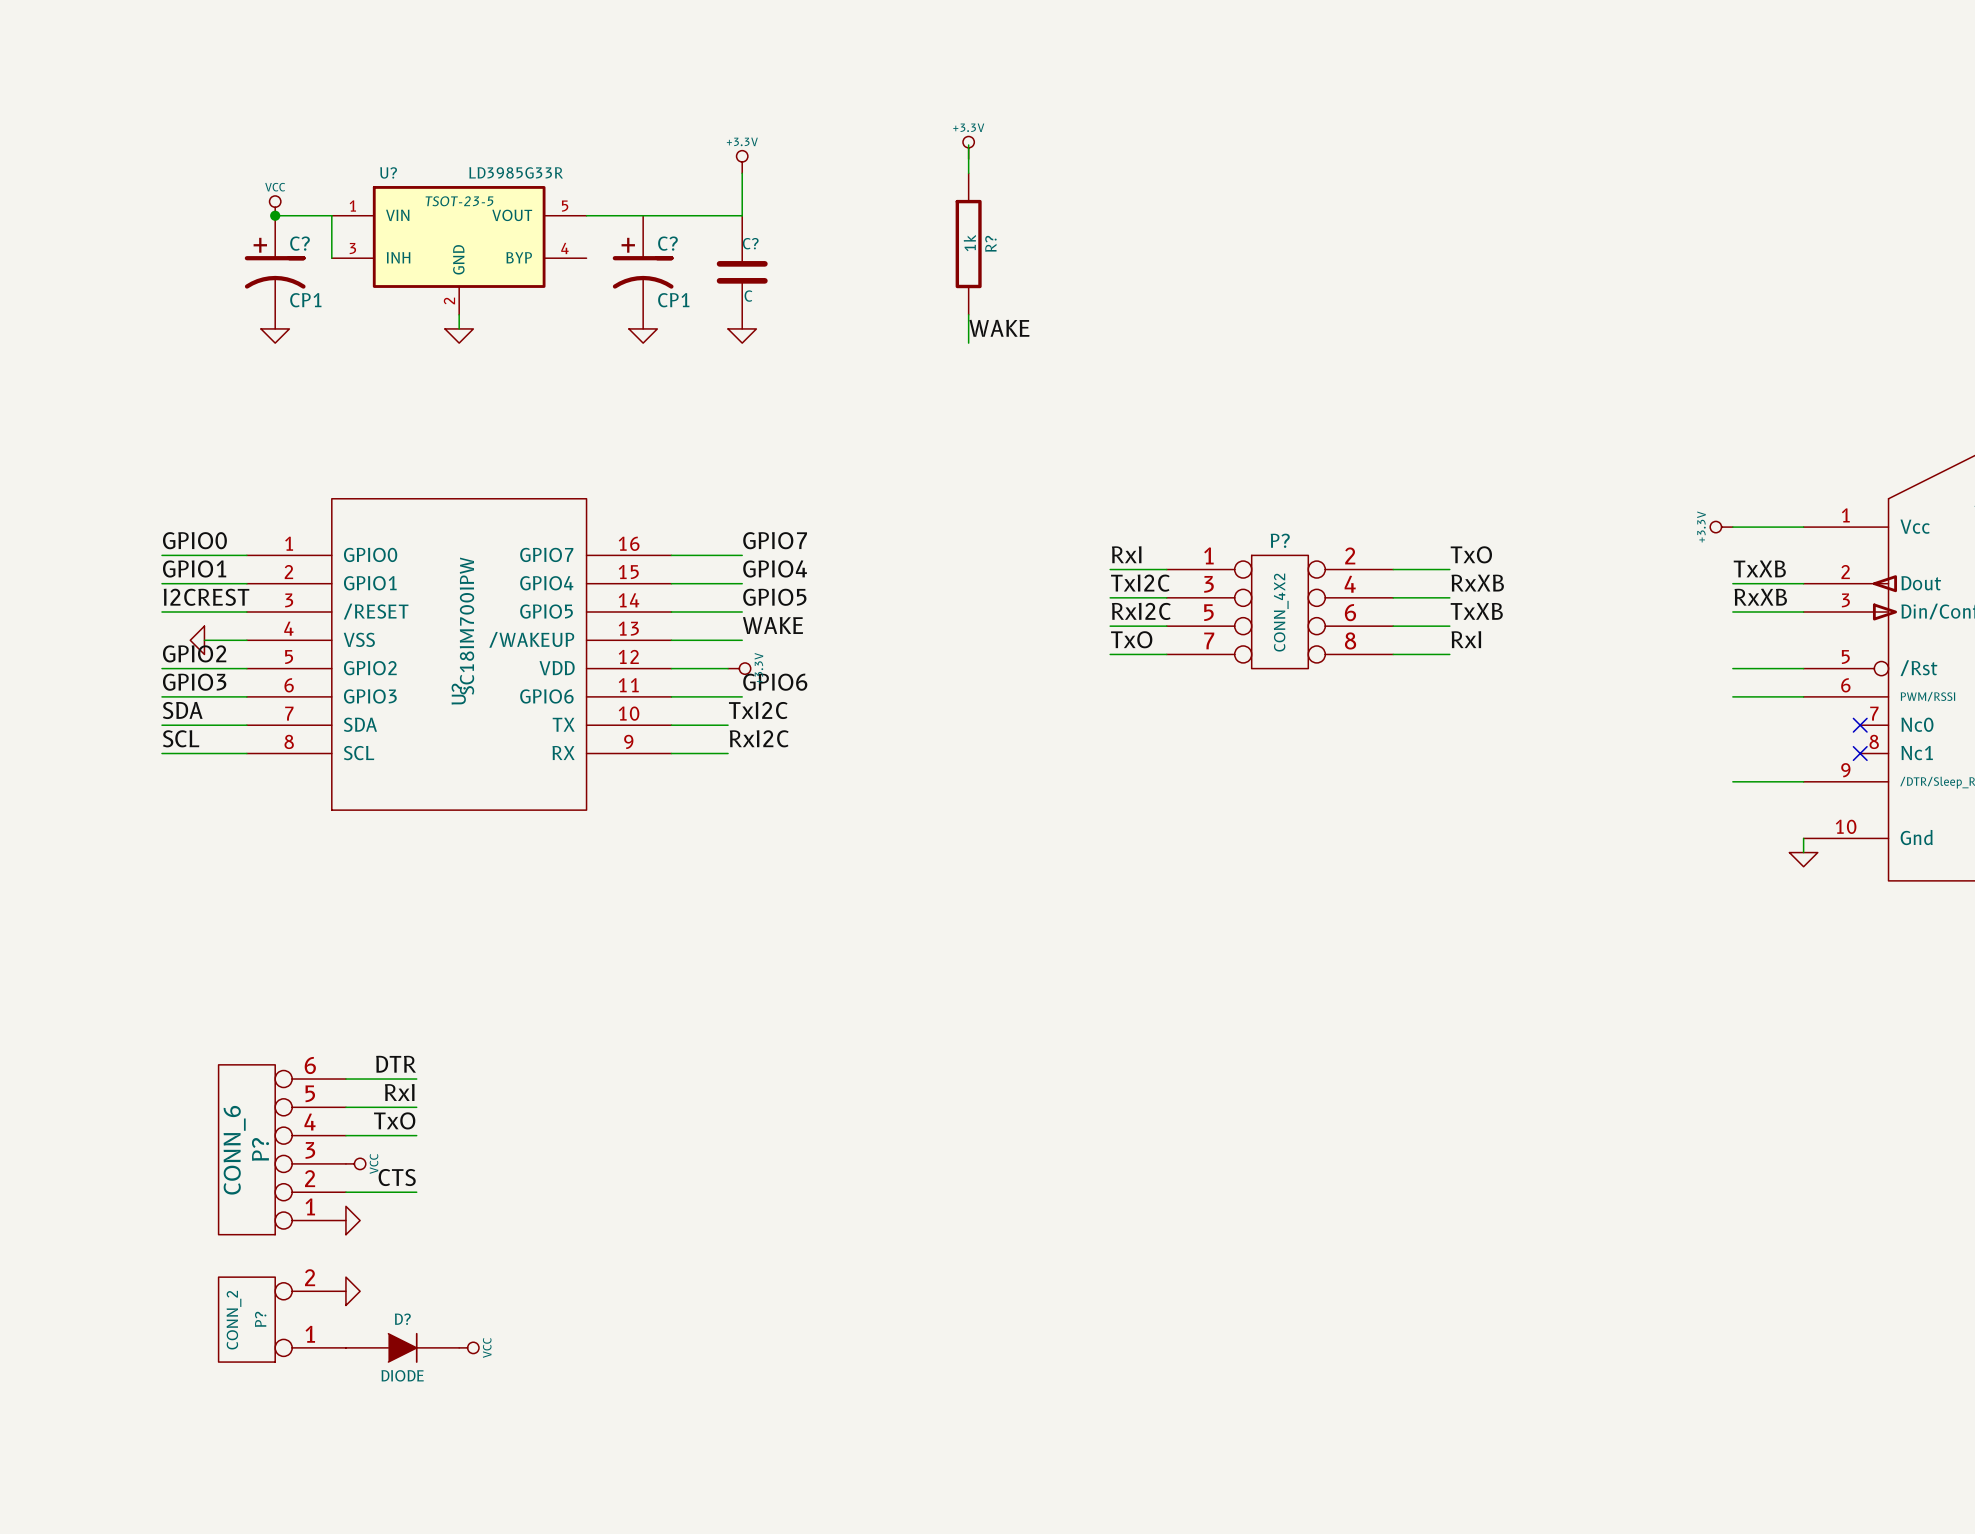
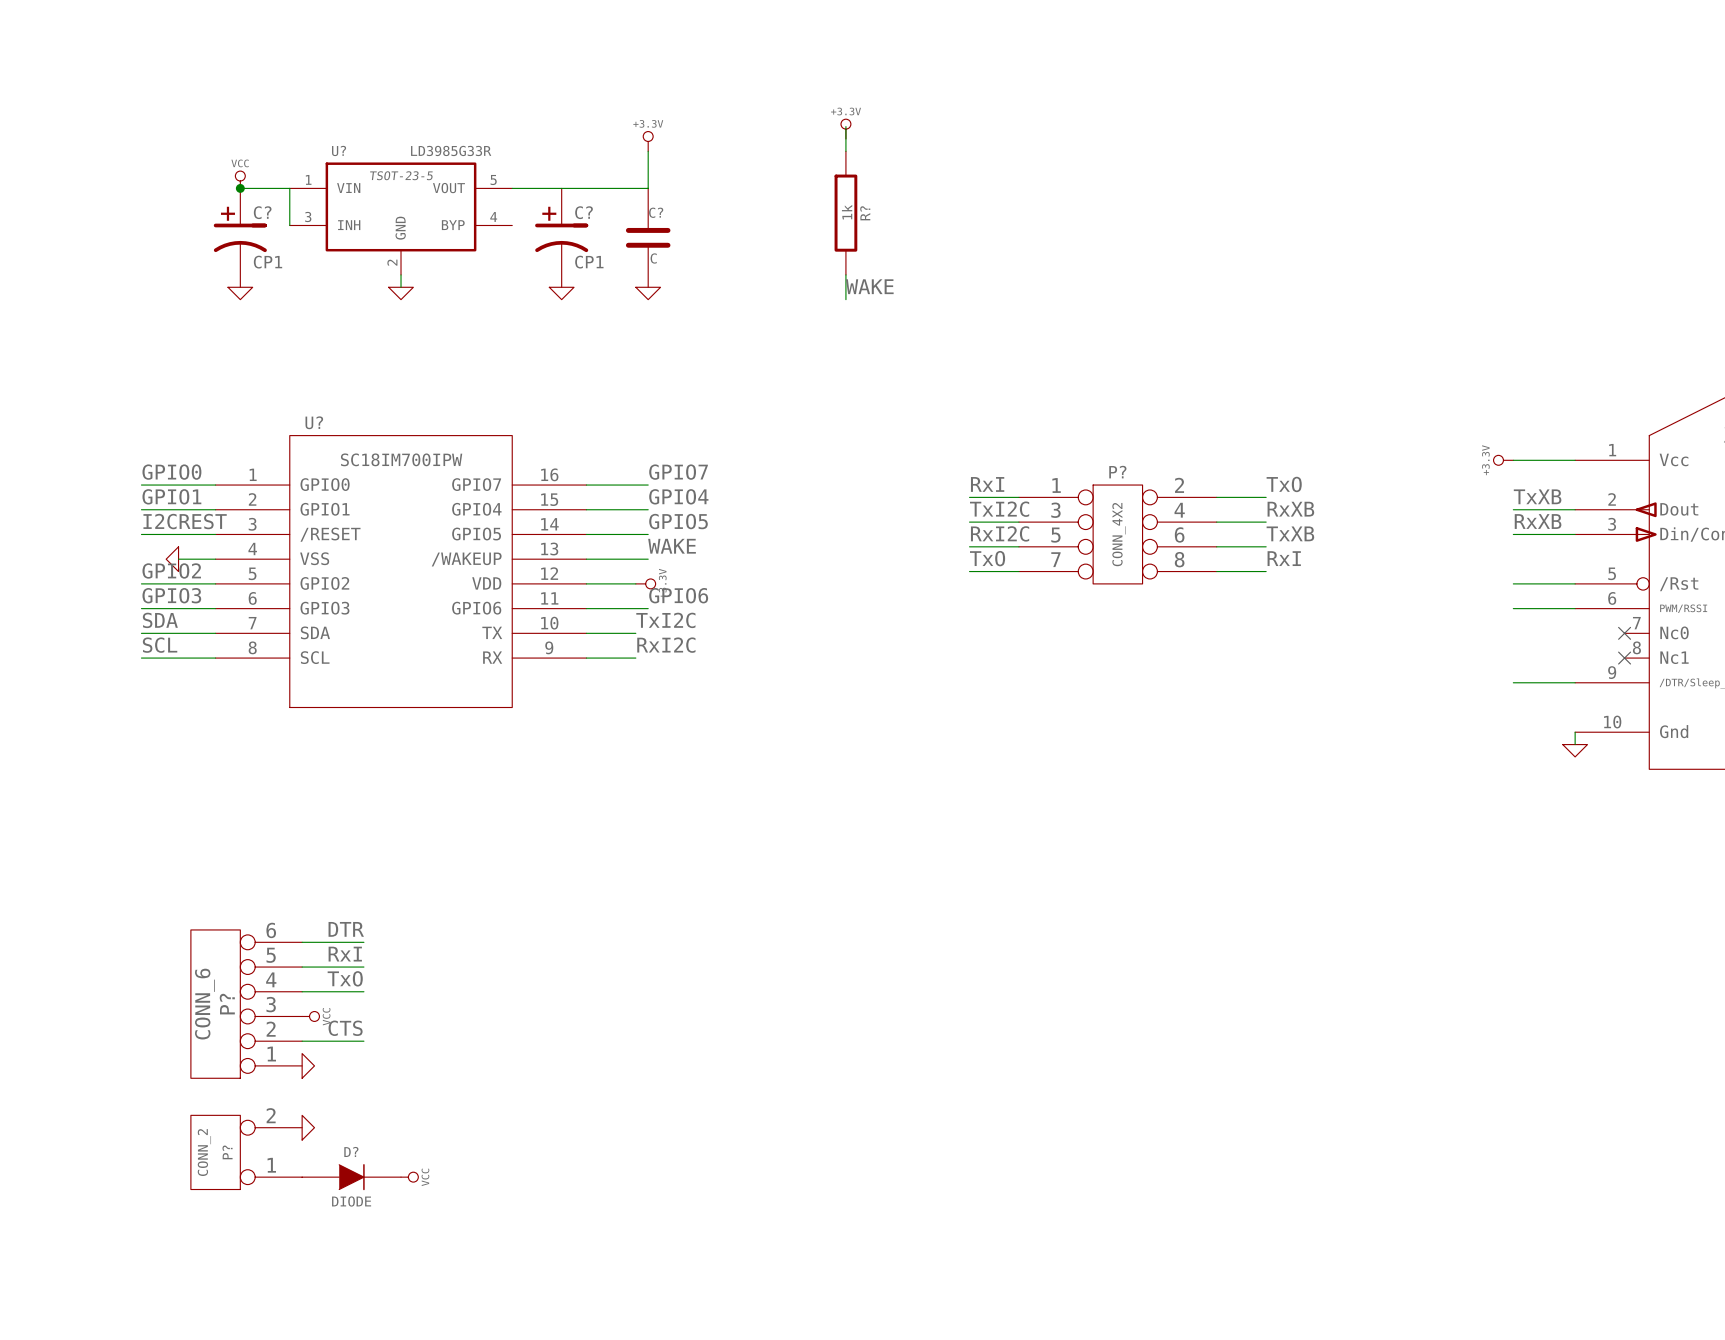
U? value rotation: 0° (467, 626) -> 90° clockwise (401, 459)
U? name rotation: 0° (458, 694) -> 90° clockwise (314, 422)
U? name position: U? (458, 694) -> U? (314, 422)

